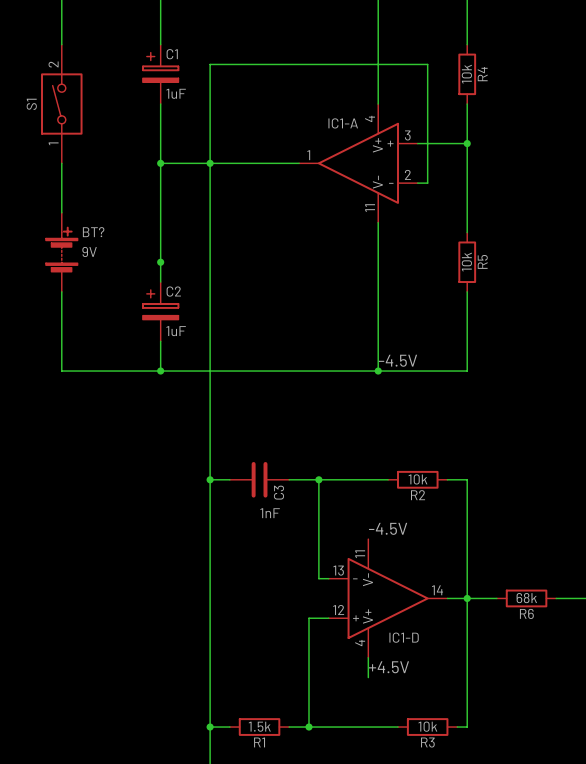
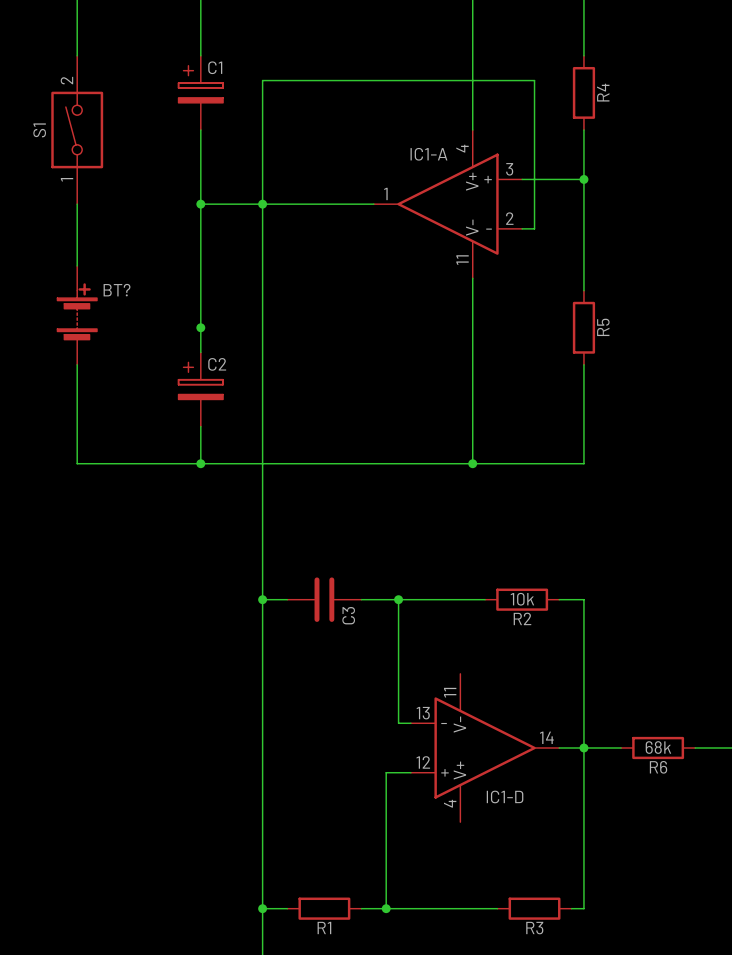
R4 value: 10k (466, 74) -> none
C1 value: 1uF (176, 93) -> none
BT? value: 9V (89, 251) -> none
R5 value: 10k (466, 262) -> none
C2 value: 1uF (176, 331) -> none
label: -4.5V (397, 360) -> none
C3 value: 1nF (270, 513) -> none
label: -4.5V (388, 528) -> none
wire: (368, 657) (368, 677) -> none
label: +4.5V (389, 667) -> none
R1 value: 1.5k (259, 726) -> none
R3 value: 10k (427, 726) -> none

